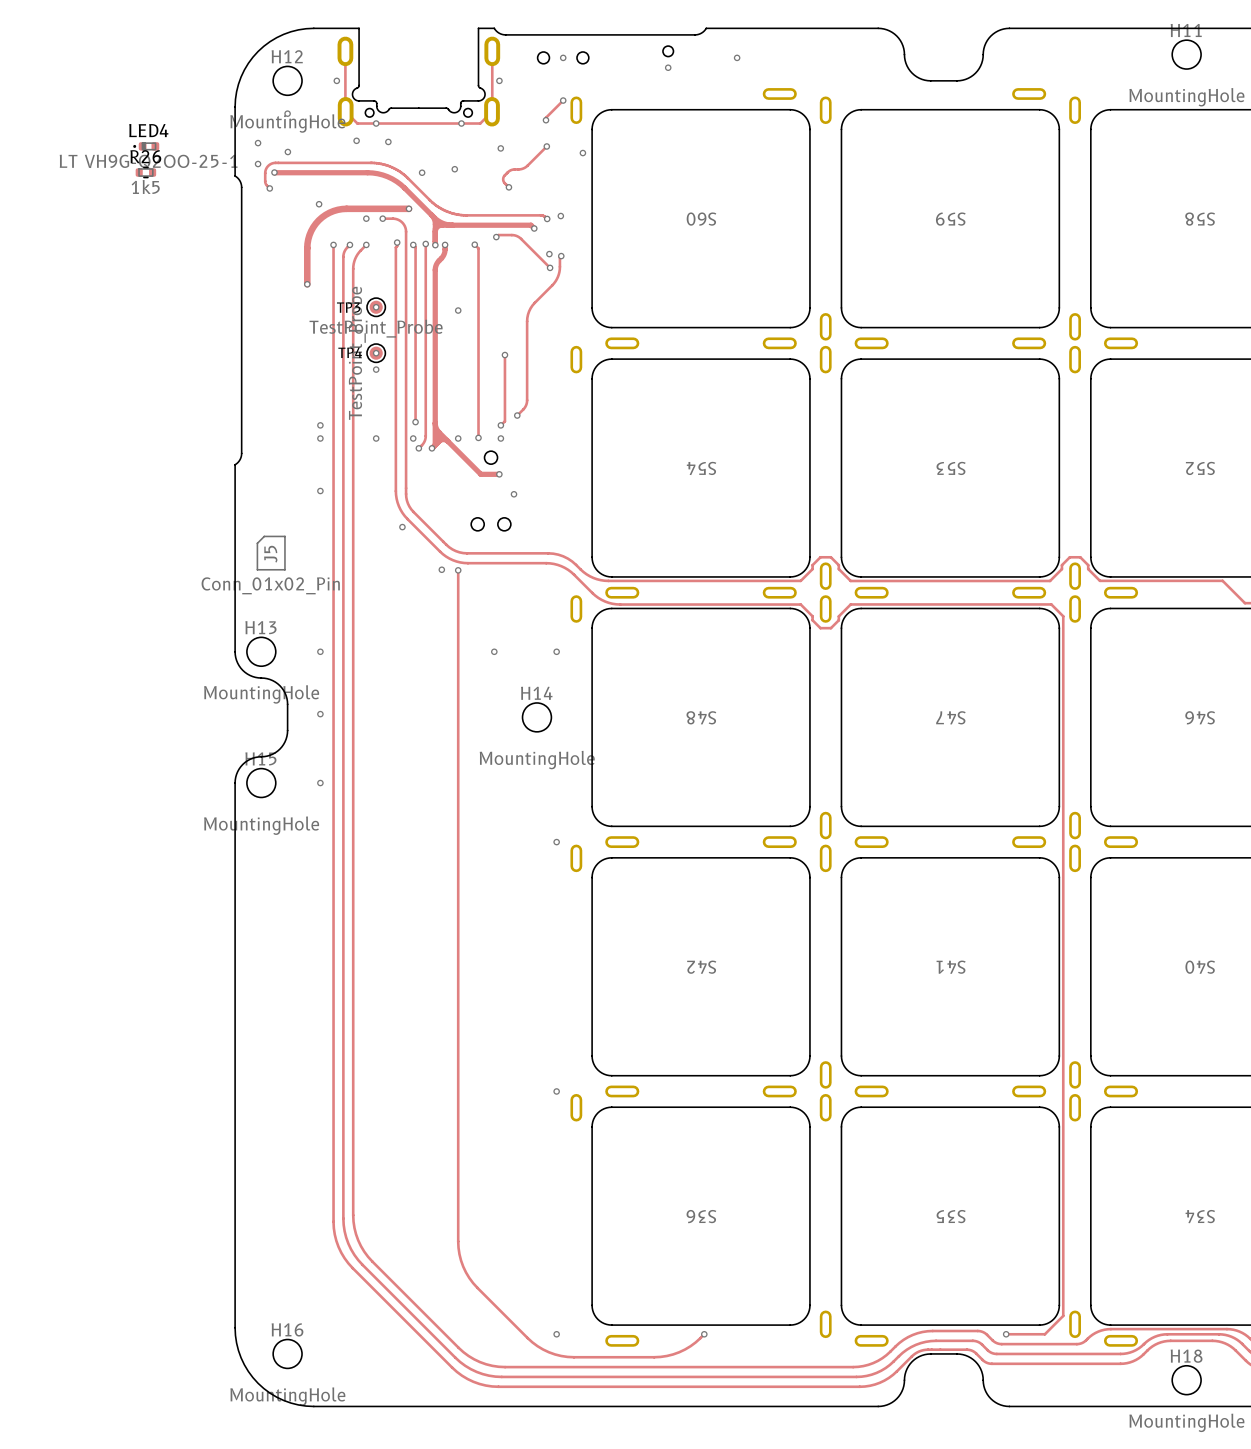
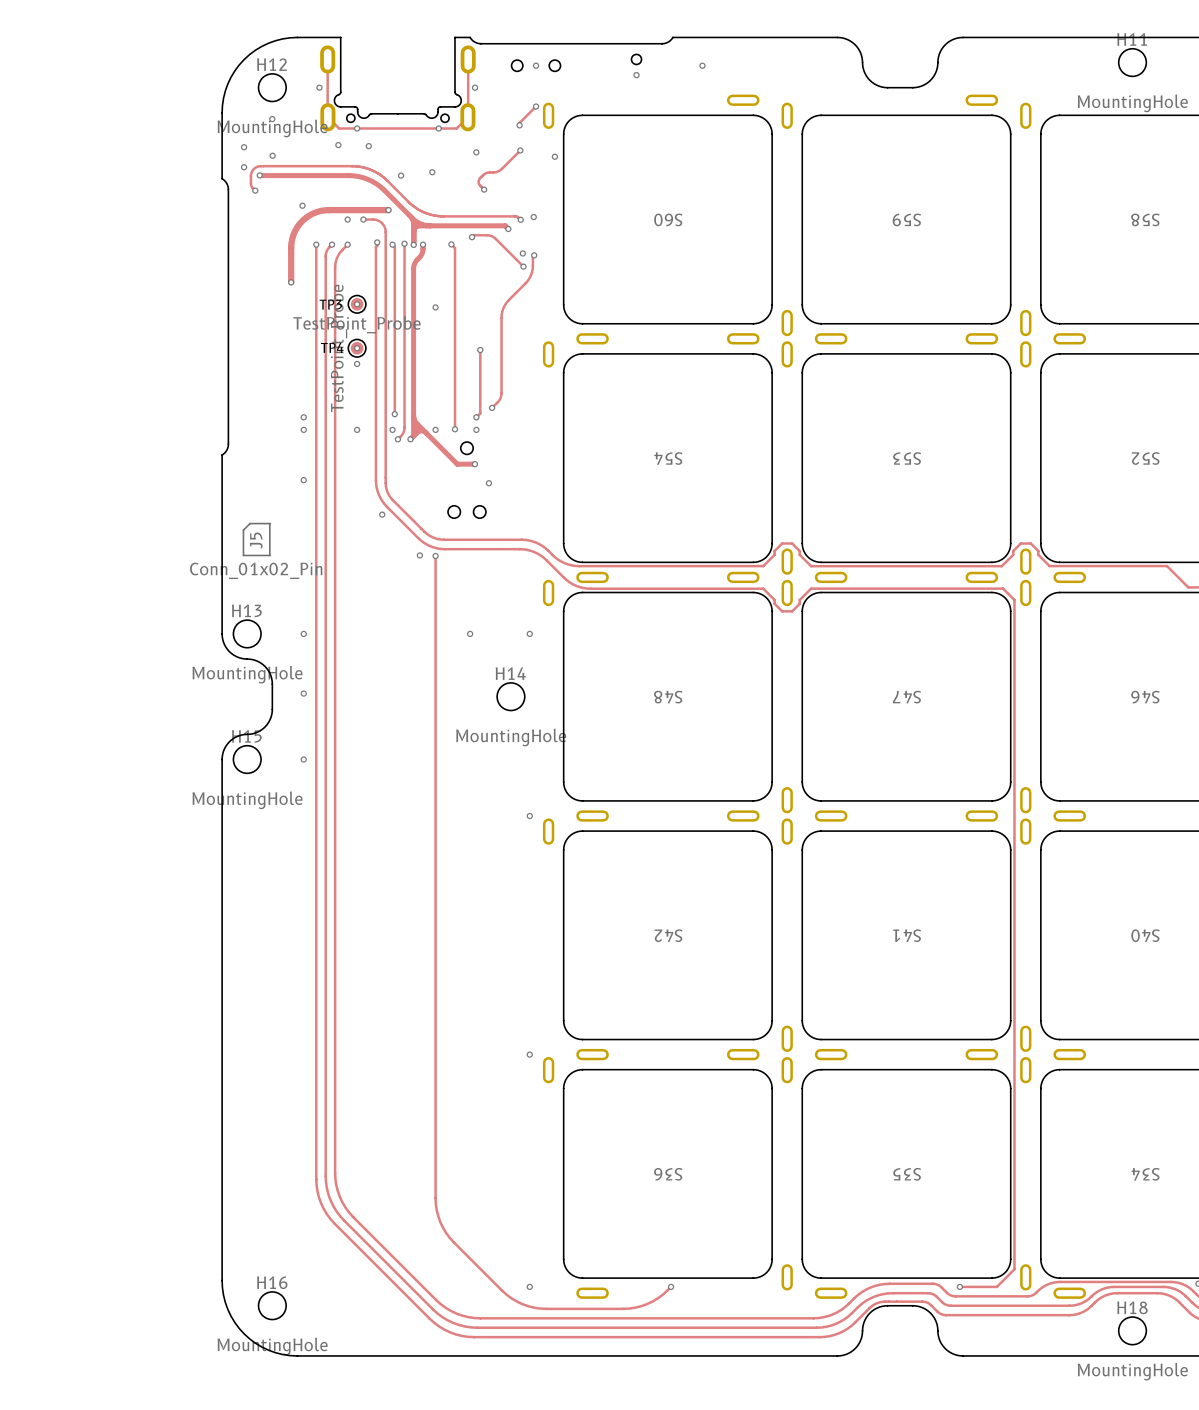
LED4: LT VH9G-Q2OO-25-1 (146, 146) -> none
R26: 1k5 (145, 172) -> none

